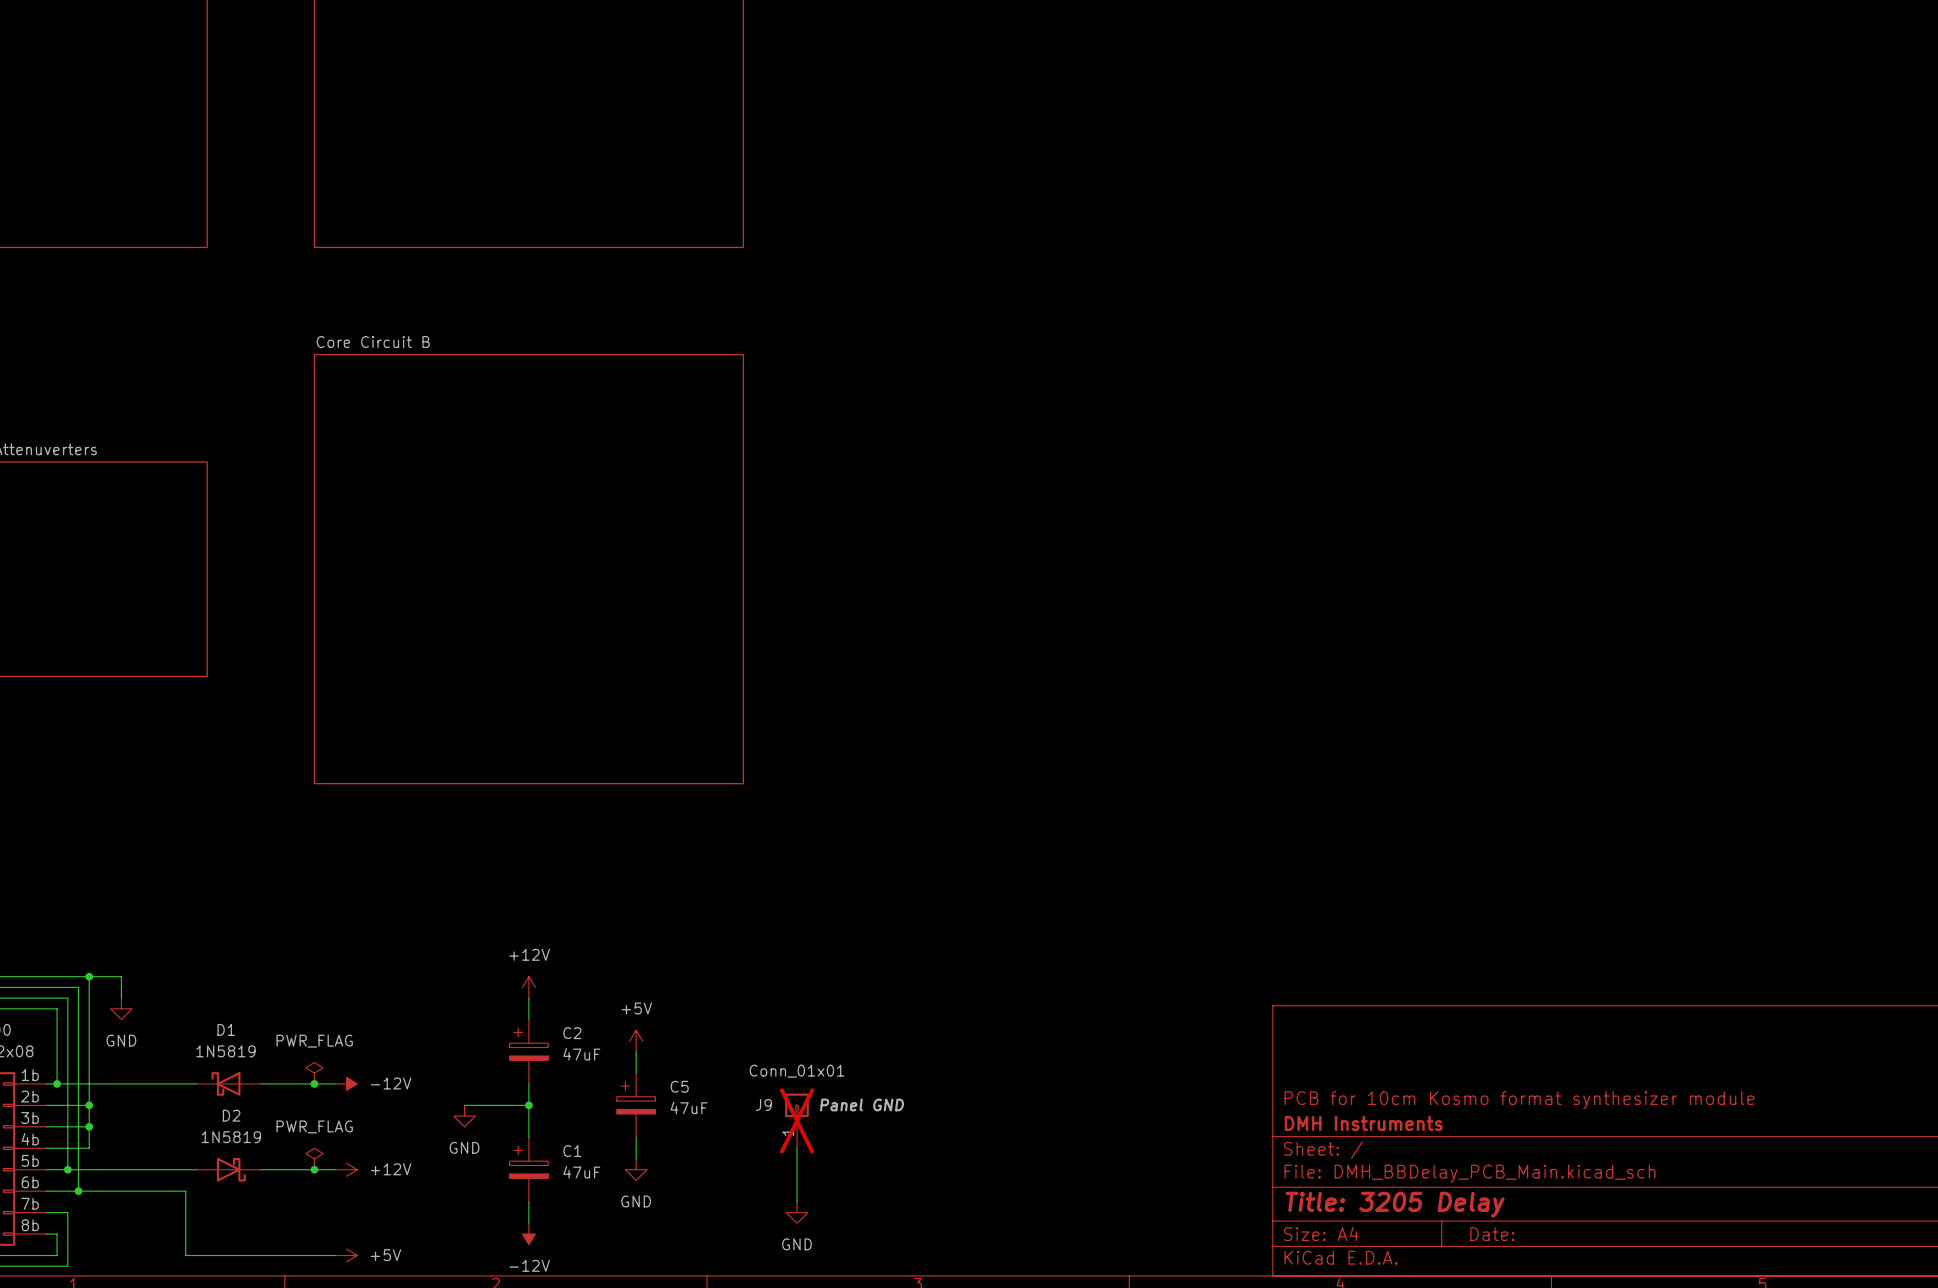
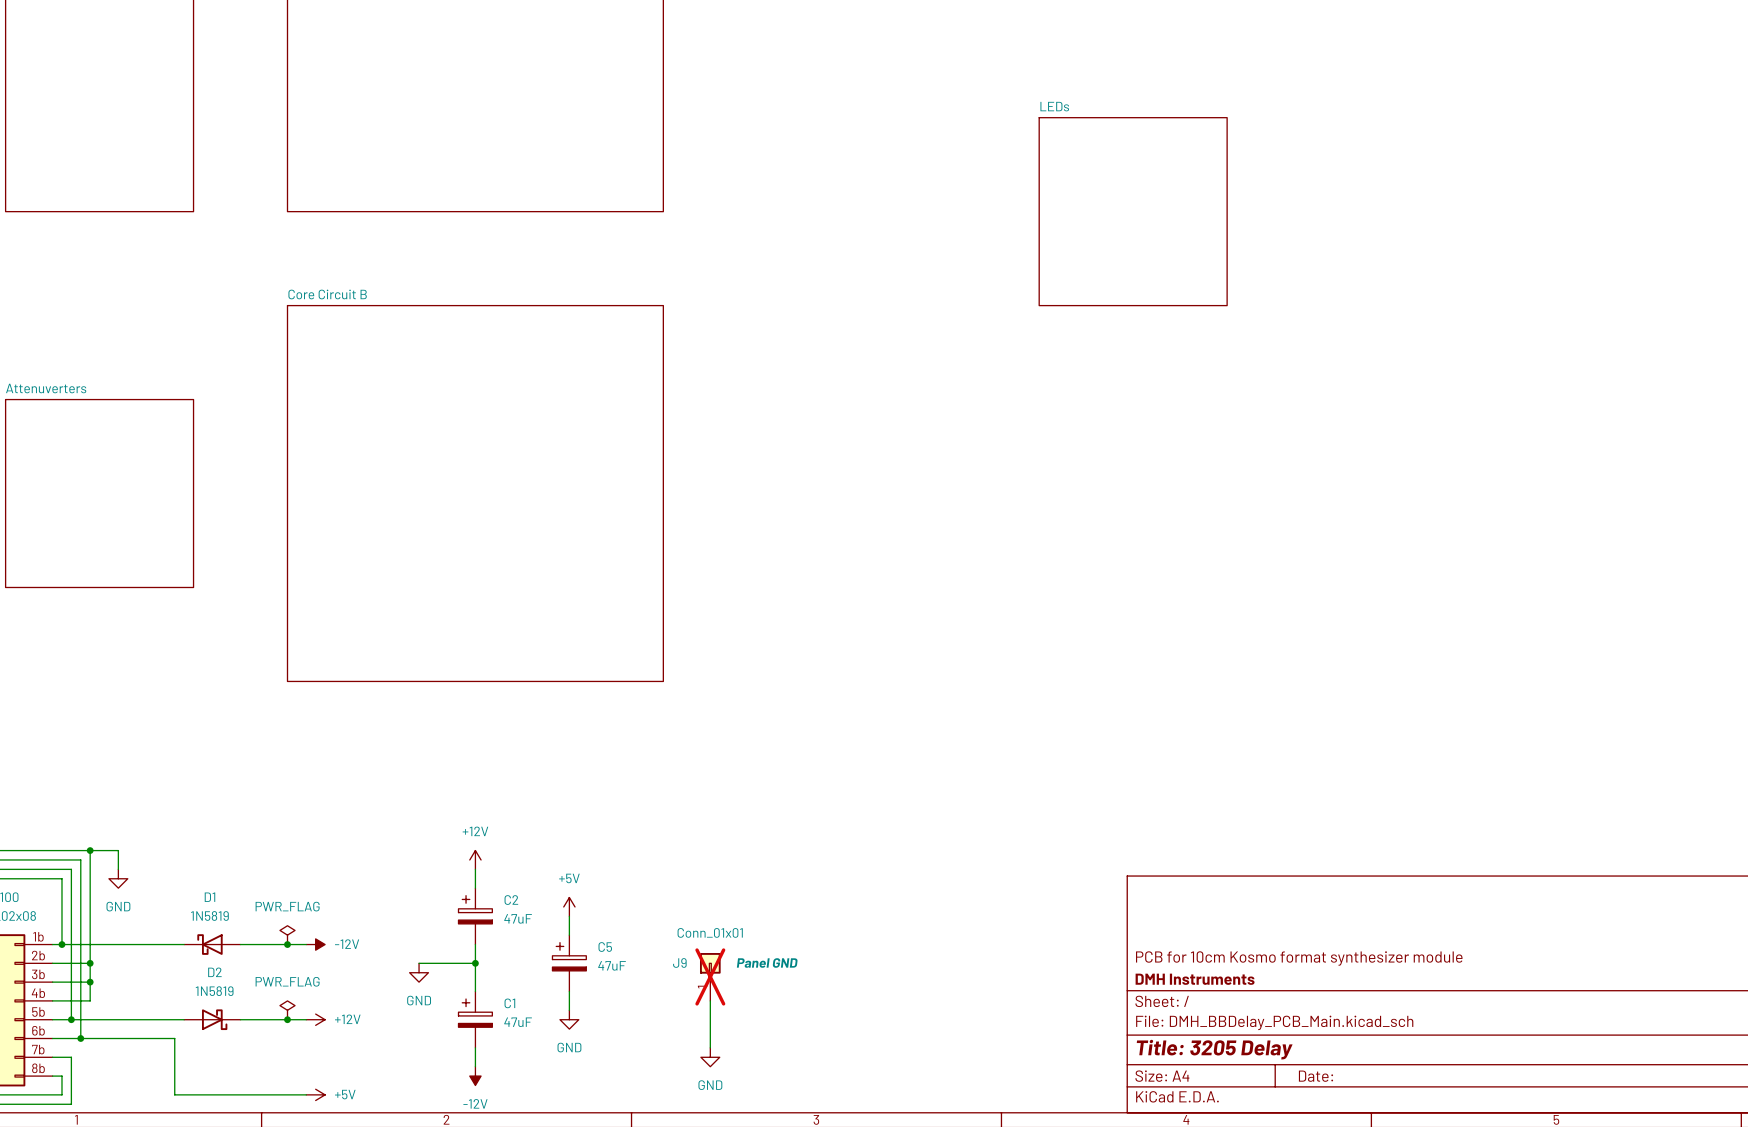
sheet LEDs: none -> (1133, 211)

